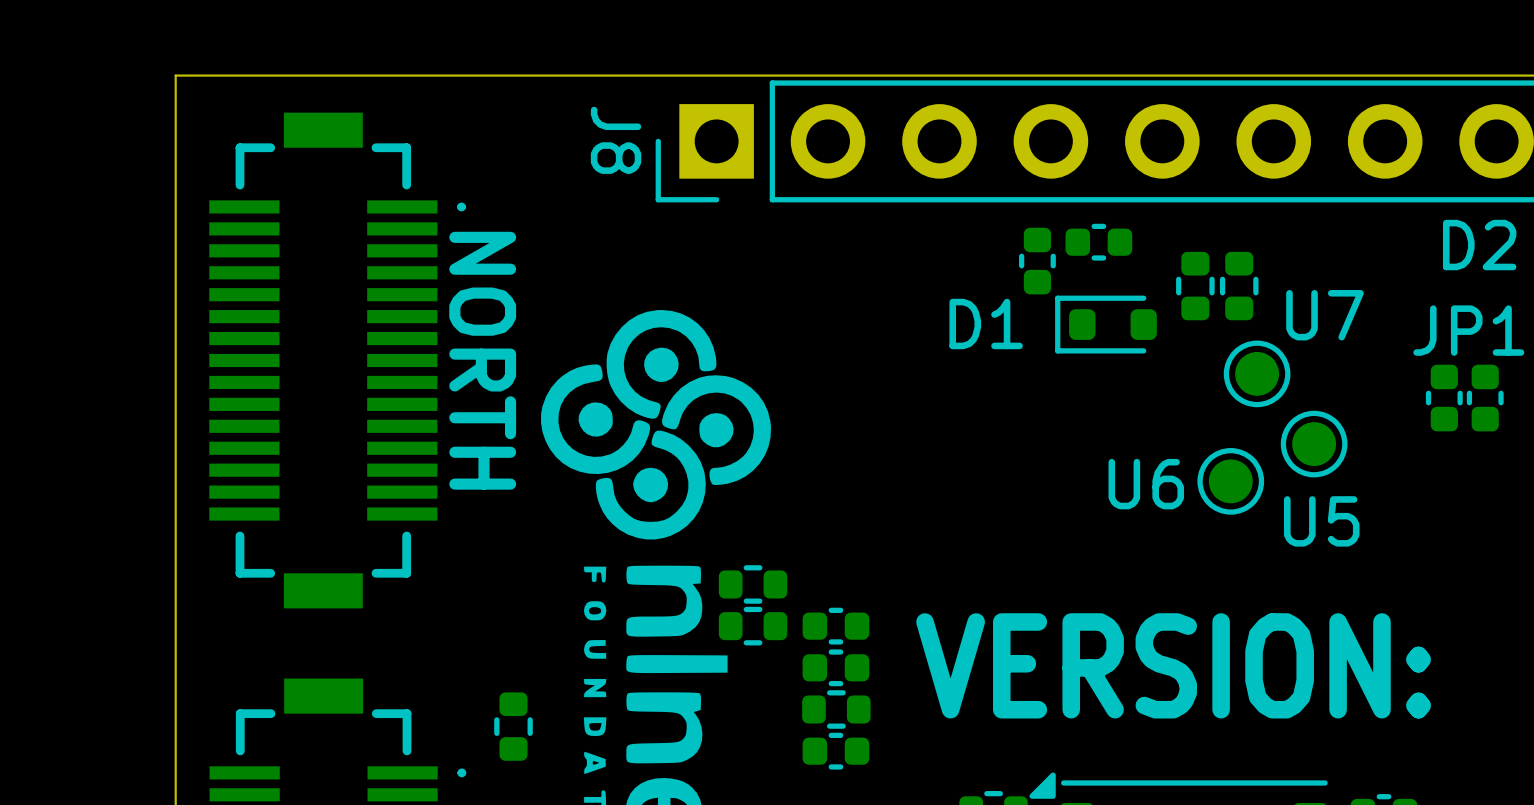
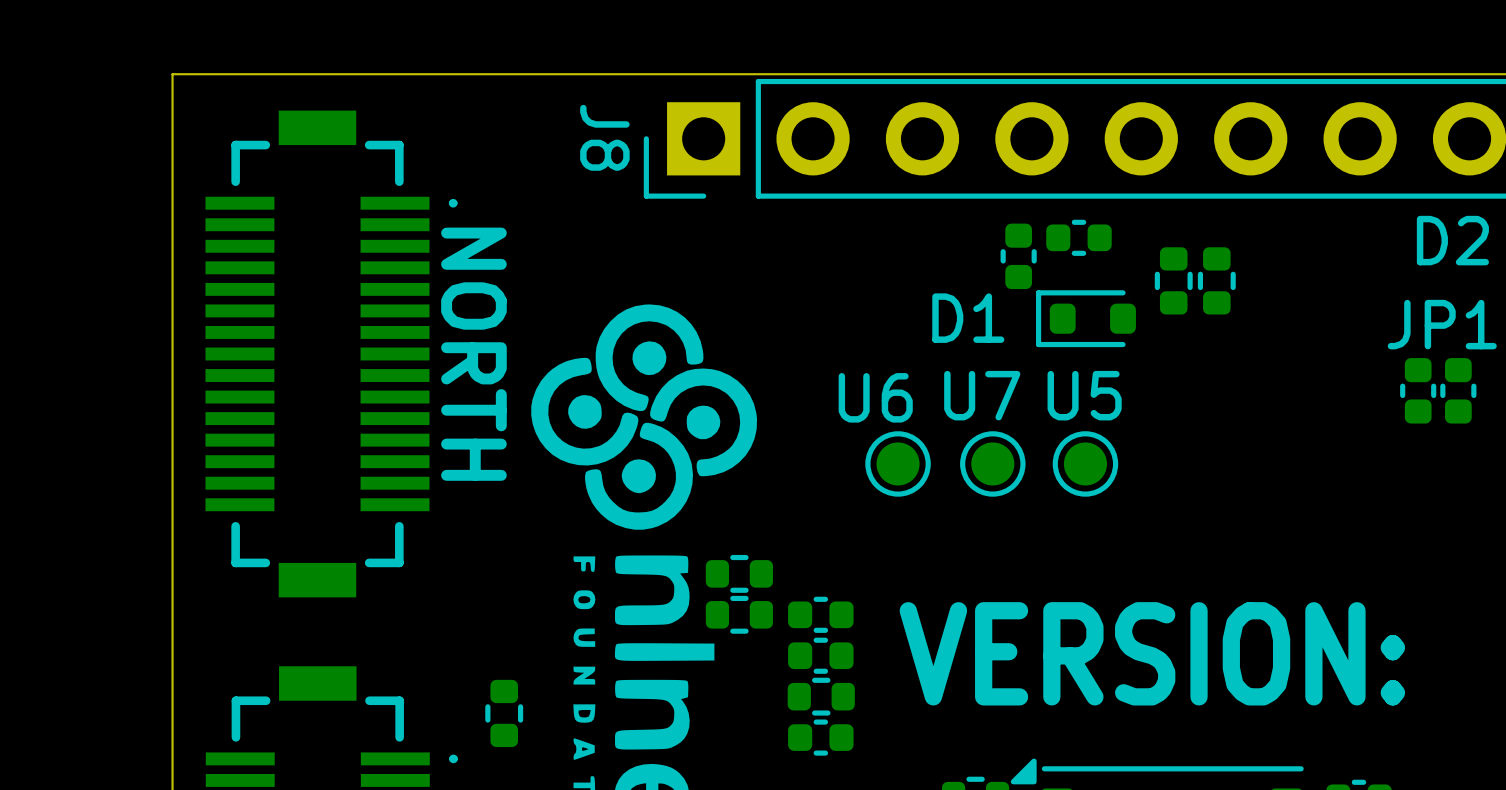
U7 name position: U7 (1324, 315) -> U7 (982, 395)
U7 position: (1257, 373) -> (992, 463)
U5 position: (1314, 444) -> (1085, 463)
U6 position: (1230, 481) -> (898, 463)
U6 name position: U6 (1146, 484) -> U6 (875, 397)
U5 name position: U5 (1321, 521) -> U5 (1084, 395)

